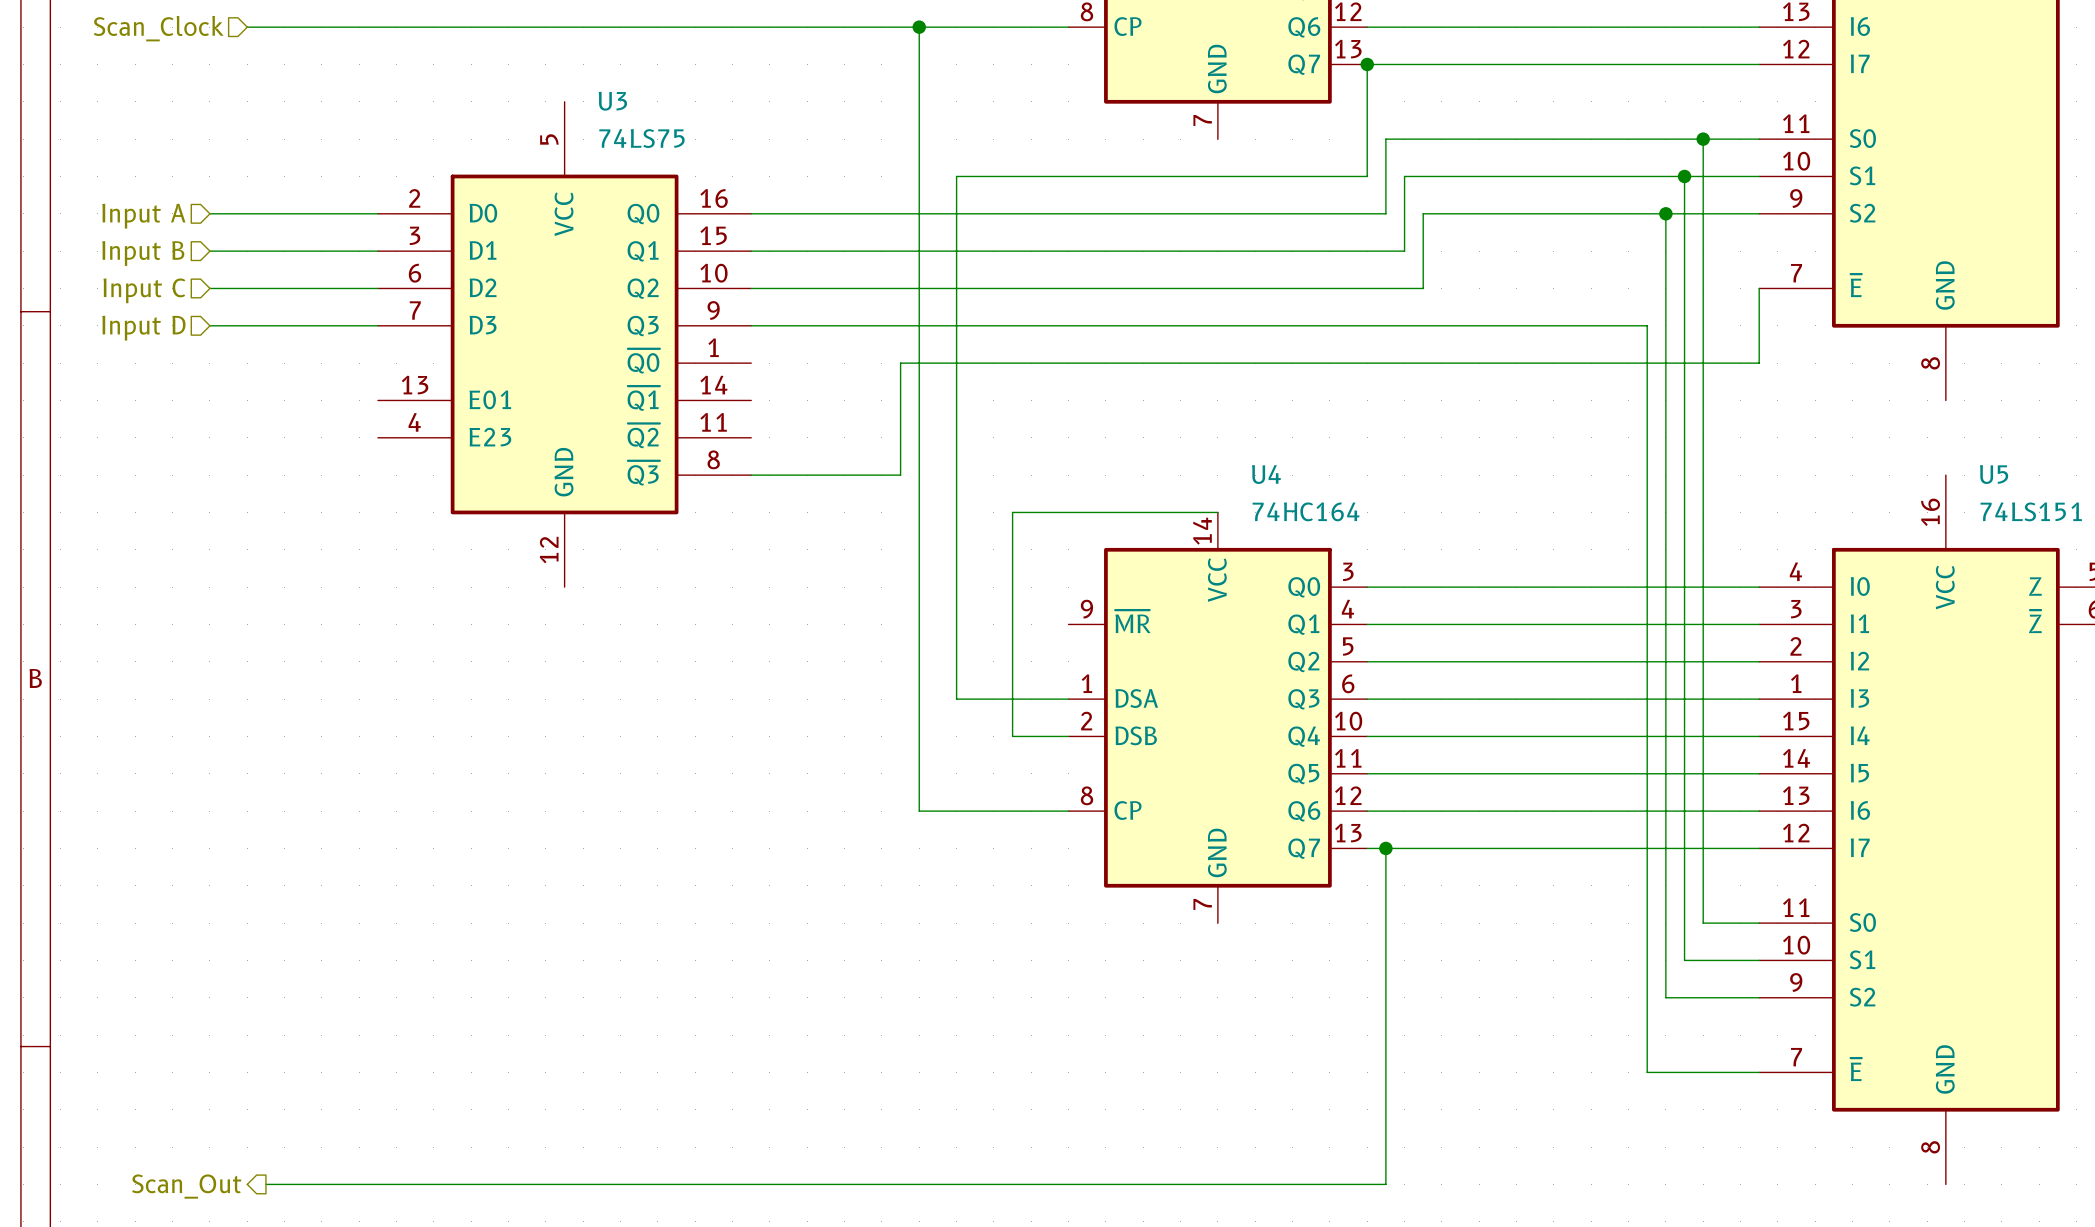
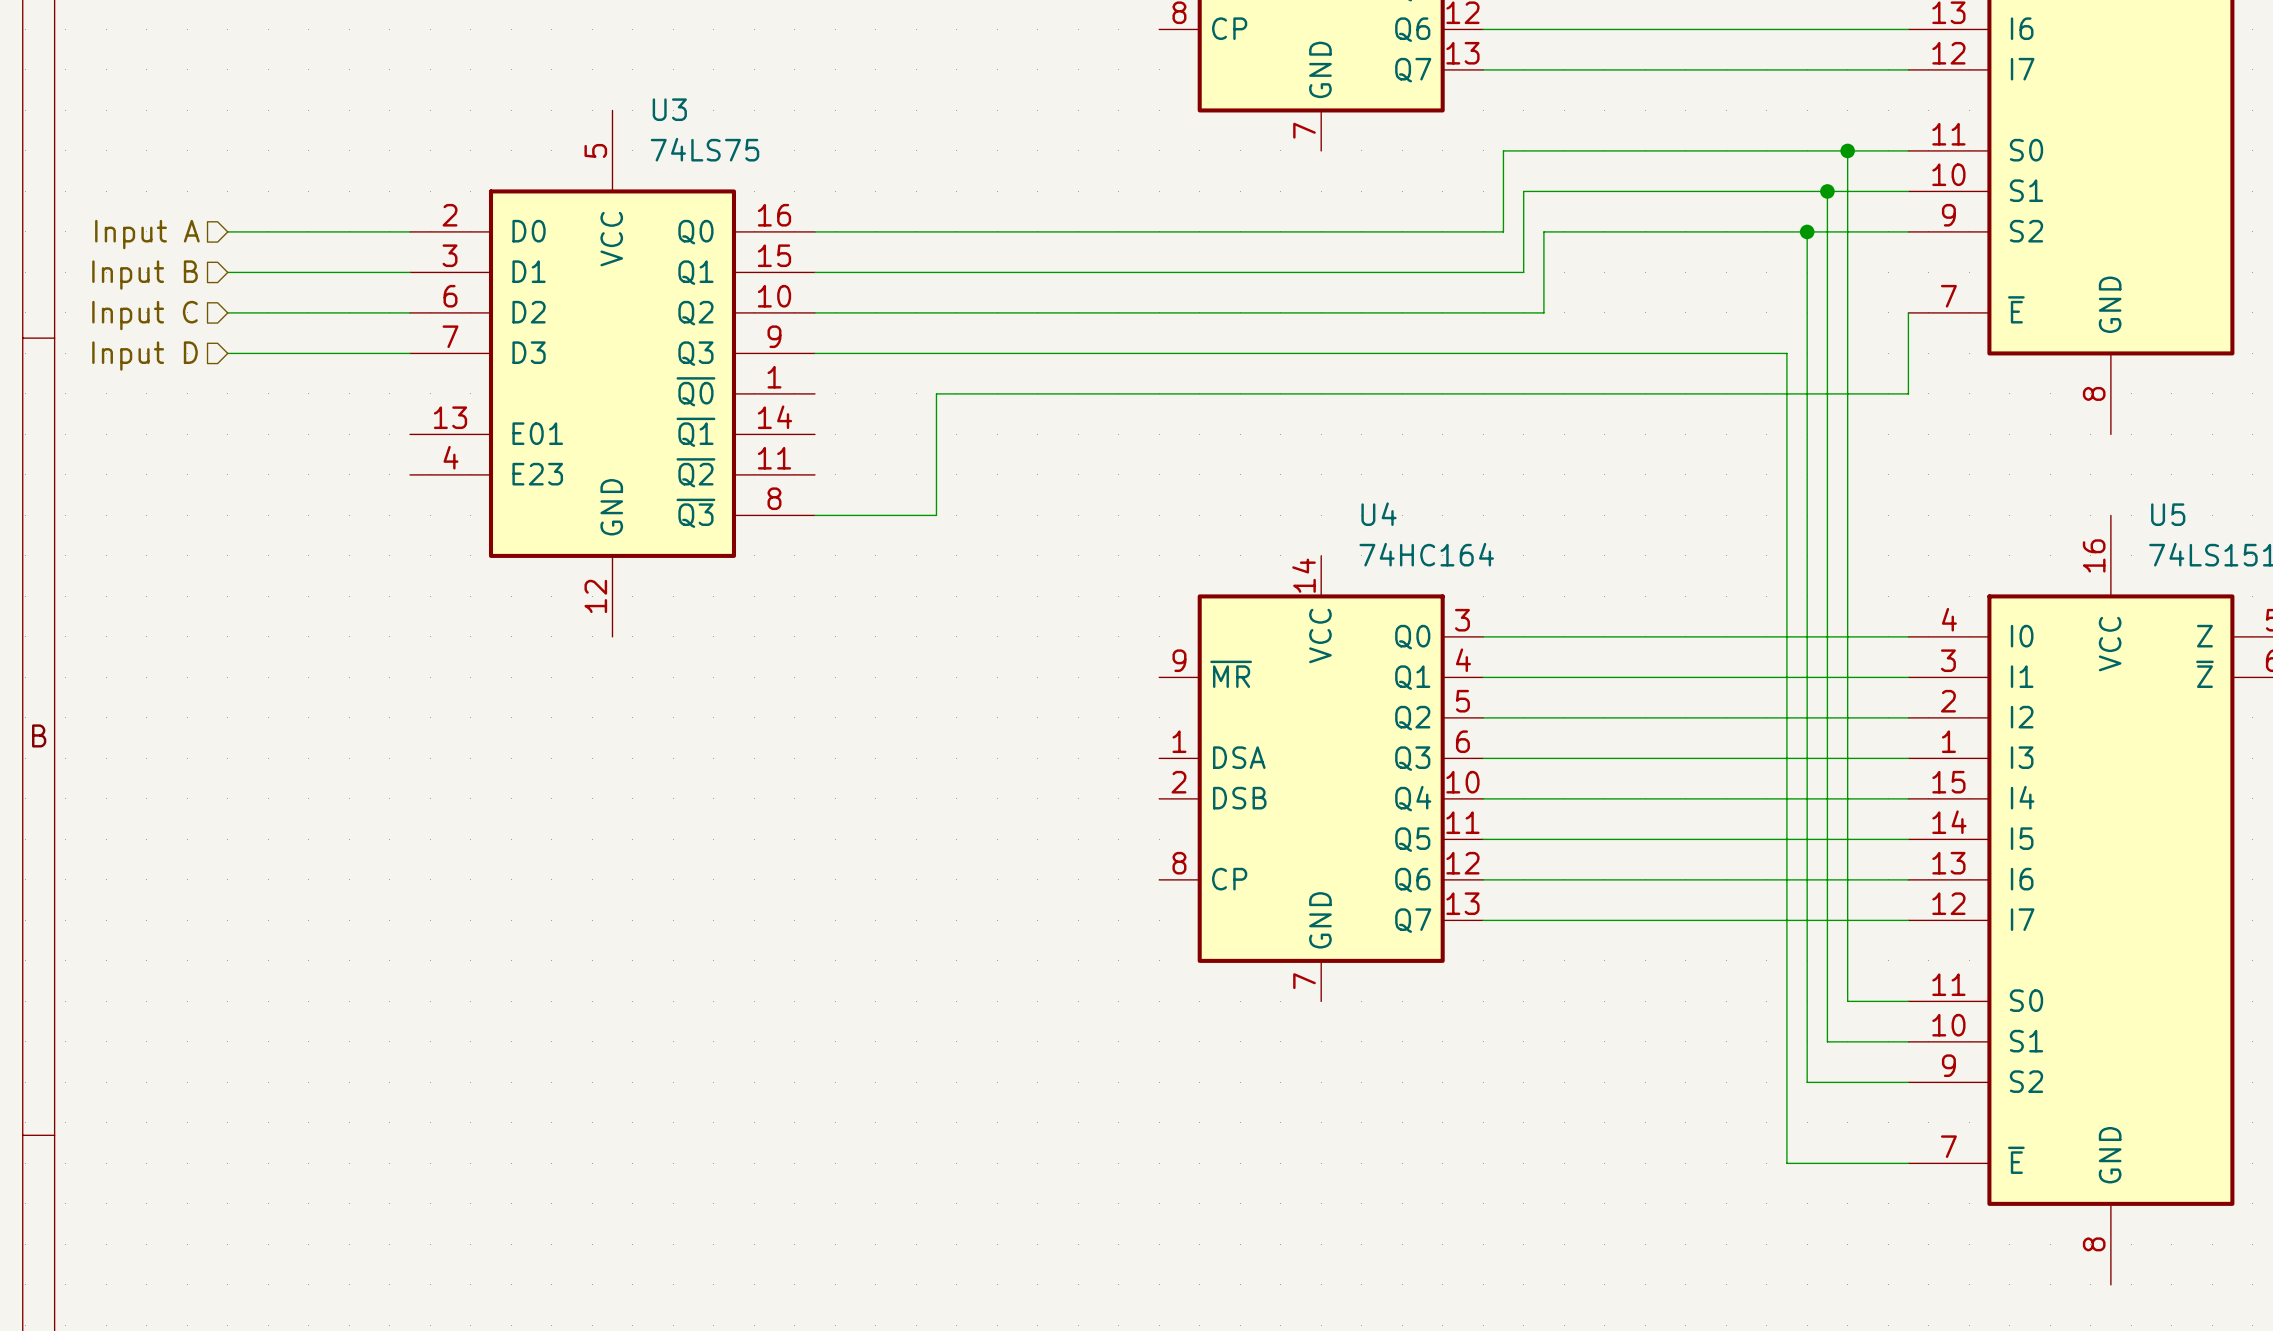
wire: (247, 27) (1068, 27) -> none
wire: (919, 27) (919, 811) (1068, 811) -> none
junction: (919, 27) -> none
hierarchical label: Scan_Clock (158, 28) -> none
wire: (1367, 64) (1367, 176) (956, 176) (956, 699) (1068, 699) -> none
junction: (1367, 64) -> none
wire: (900, 363) (900, 475) (863, 475) -> (976, 393) (936, 393) (936, 515)
wire: (1217, 512) (1012, 512) (1012, 736) (1068, 736) -> none
wire: (1385, 848) (1385, 1184) (265, 1184) -> none
junction: (1385, 848) -> none
hierarchical label: Scan_Out (186, 1186) -> none

